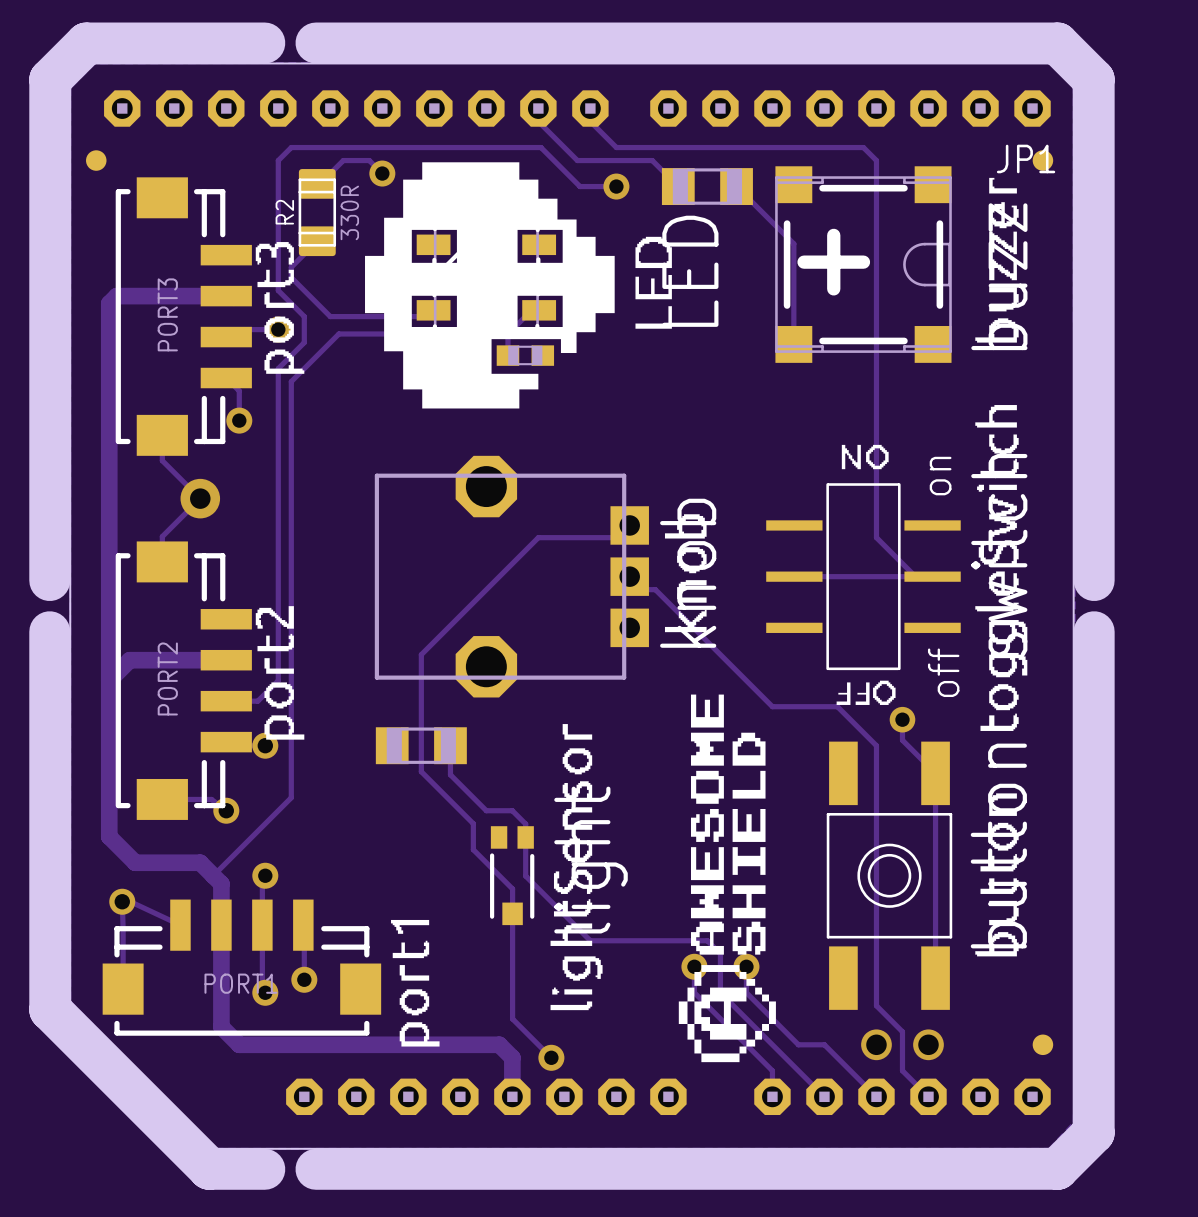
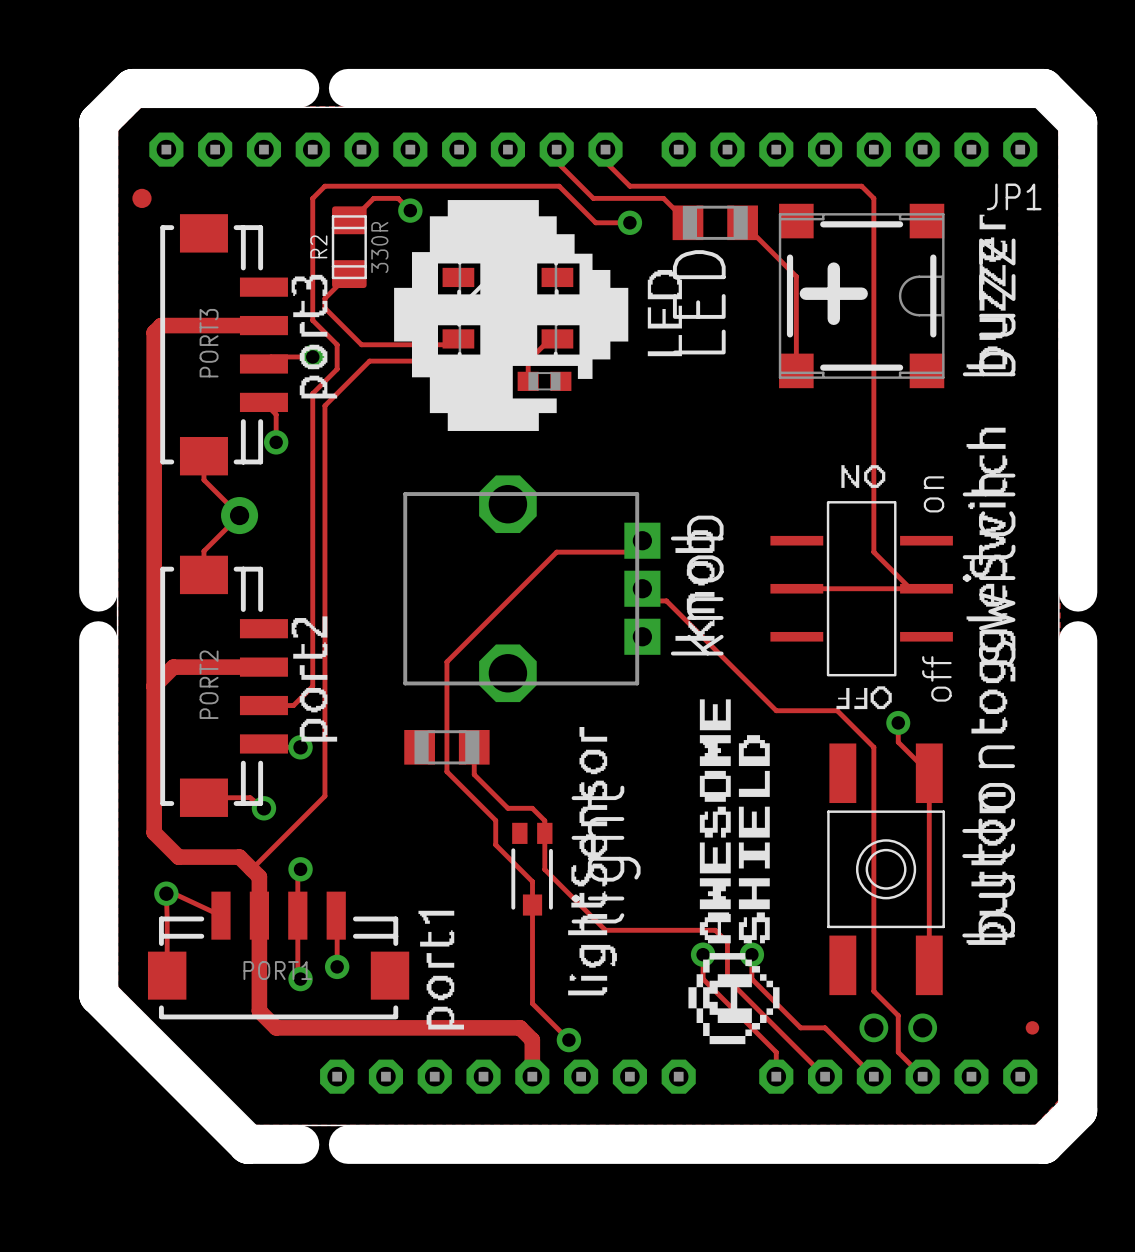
part: (1042, 160) -> none
part footprint: [1032, 1034, 1054, 1056] -> [1025, 1021, 1040, 1035]

